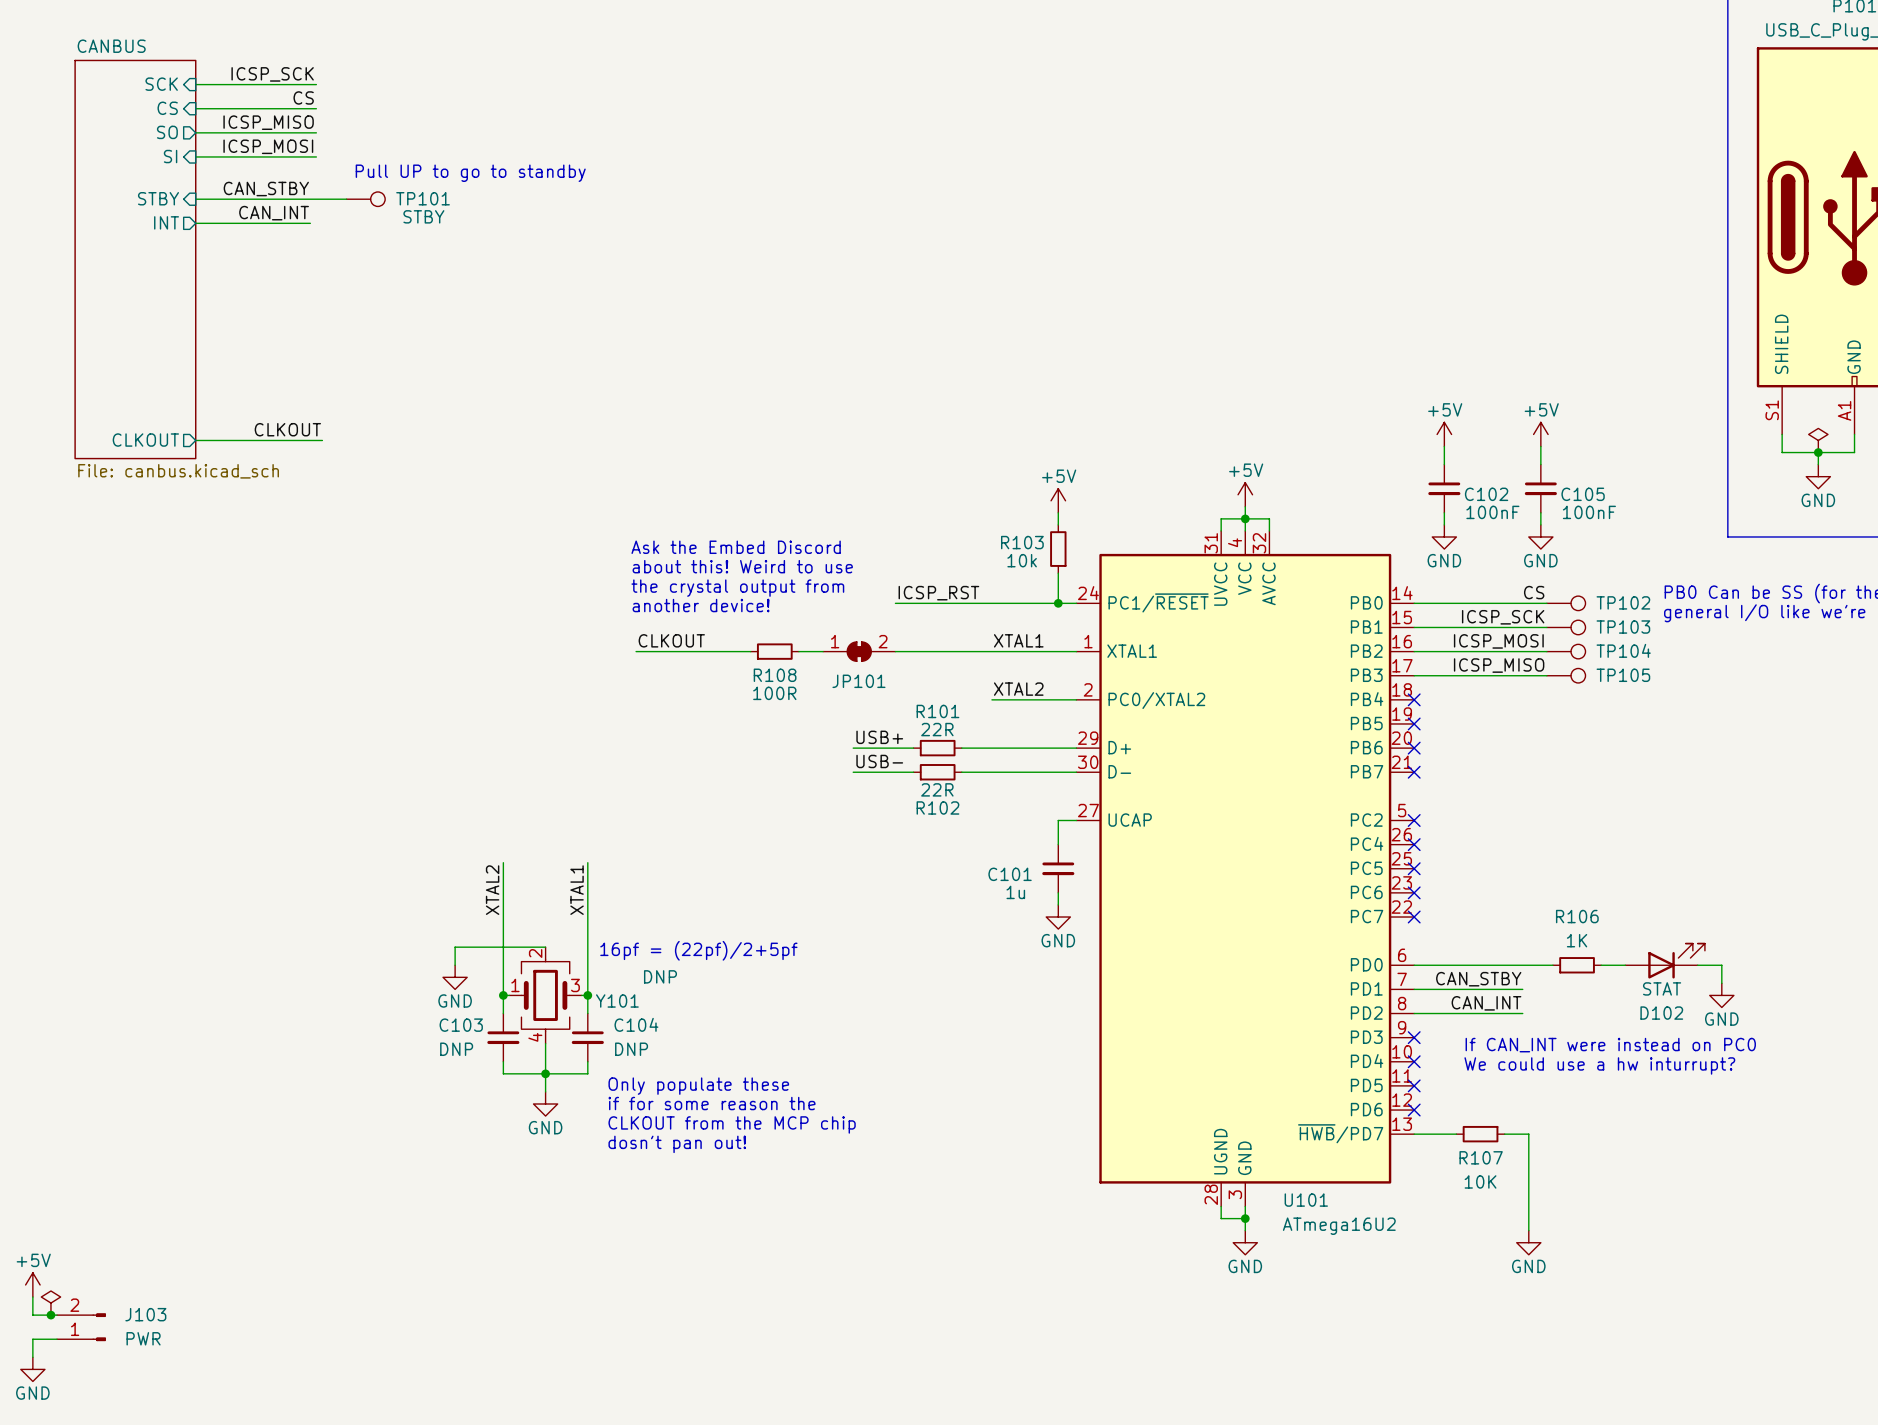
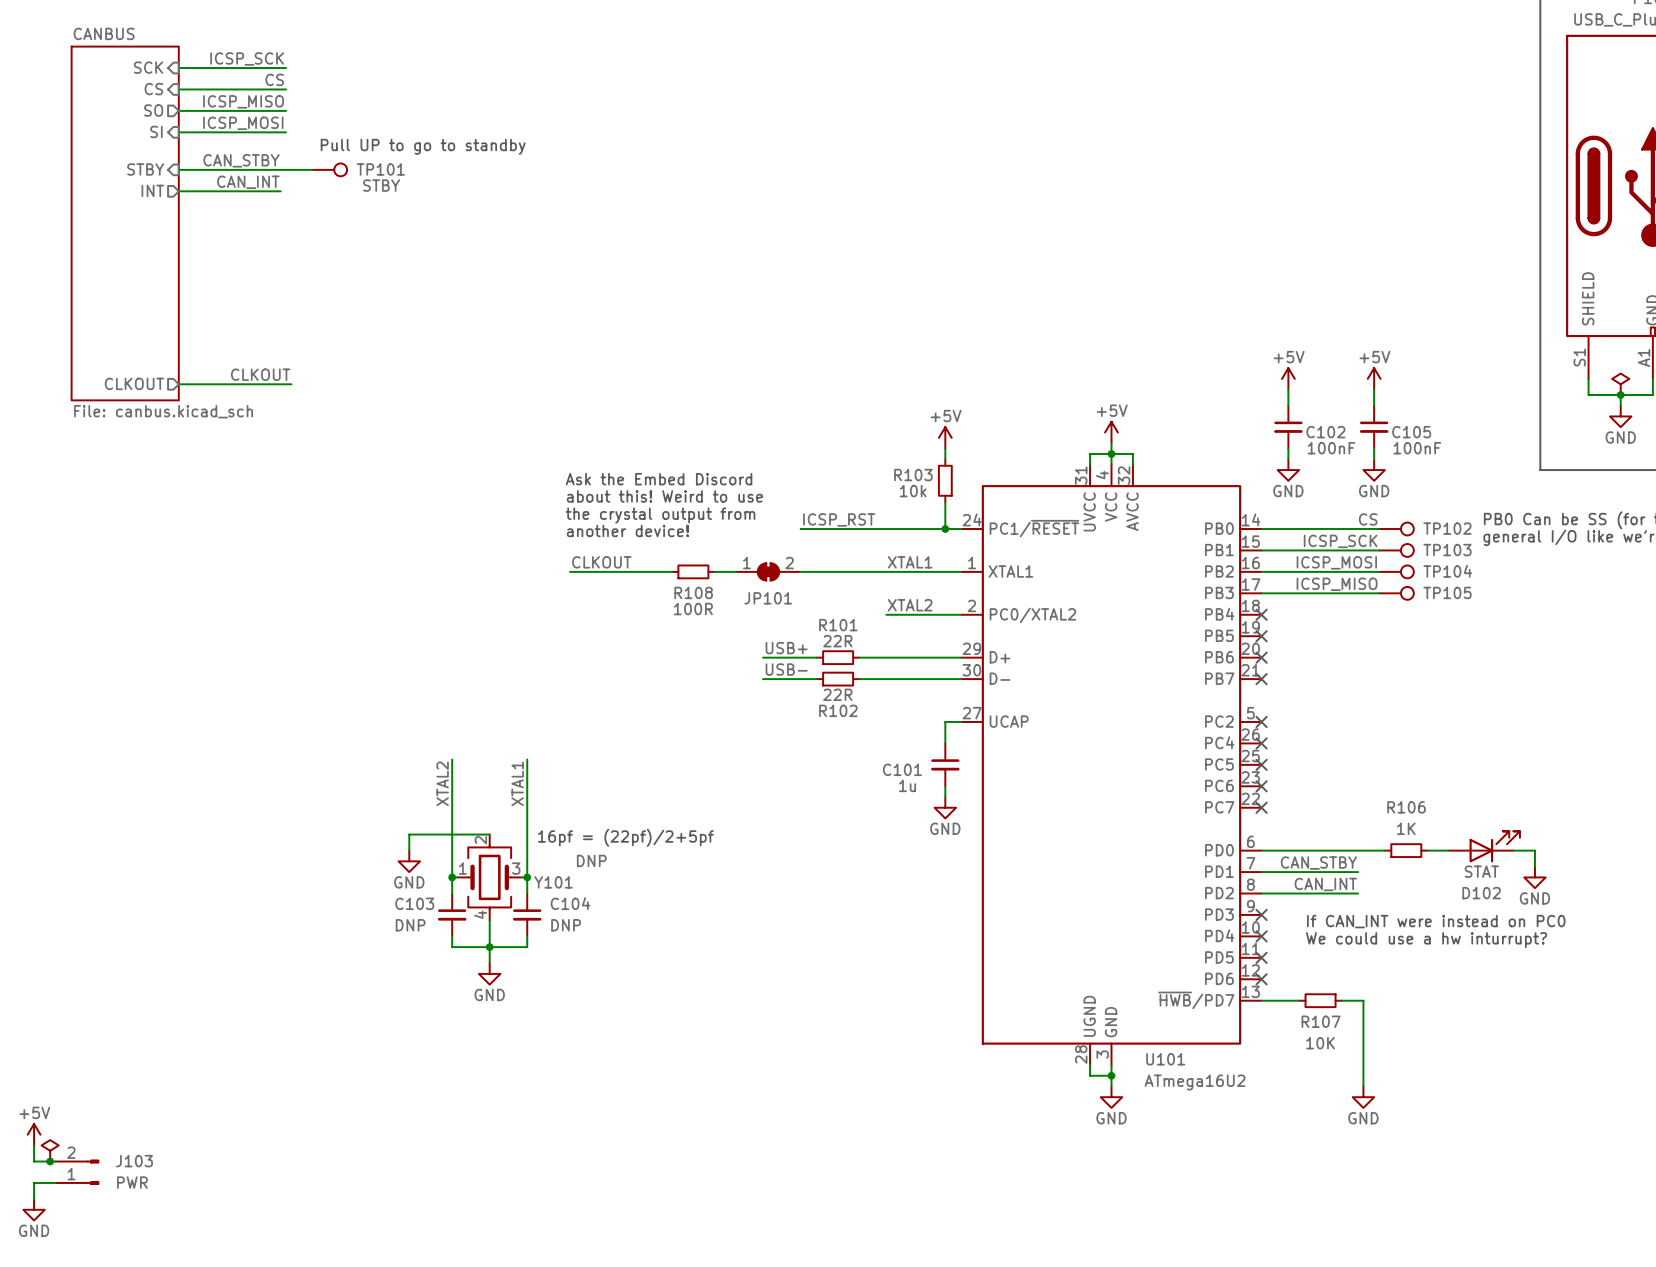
text: Only populate these (698, 1086) -> none
text: if for some reason the (711, 1103) -> none
text: CLKOUT from the MCP chip (732, 1124) -> none
text: dosn't pan out! (677, 1144) -> none

